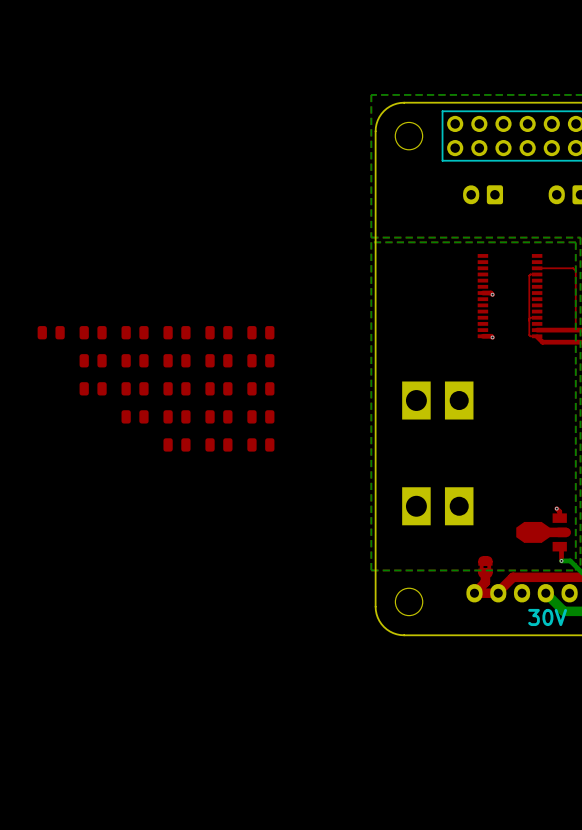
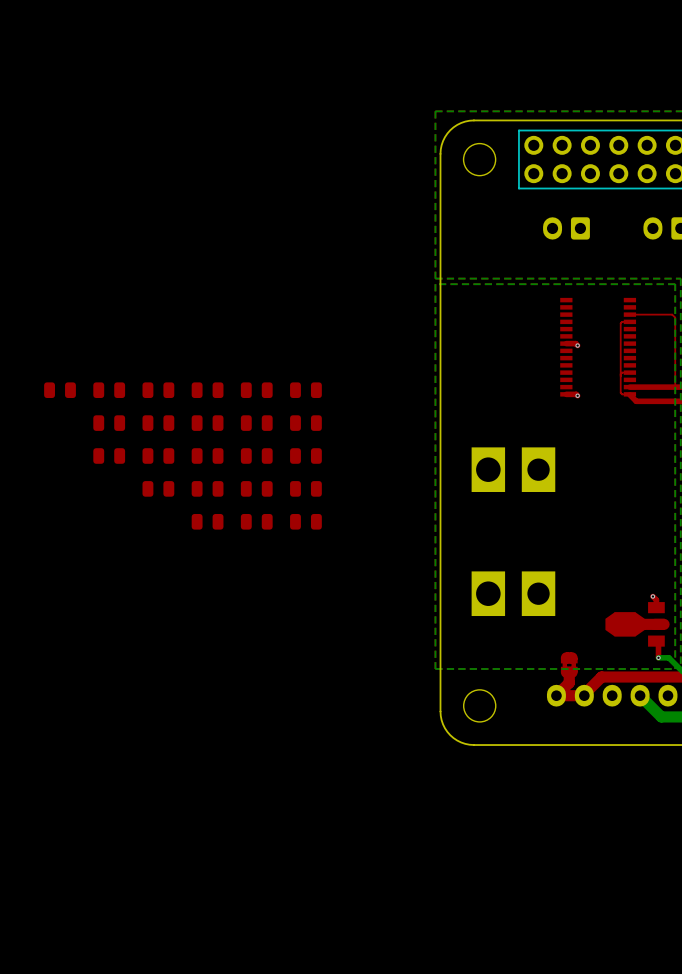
text: 30V (547, 617) -> none

